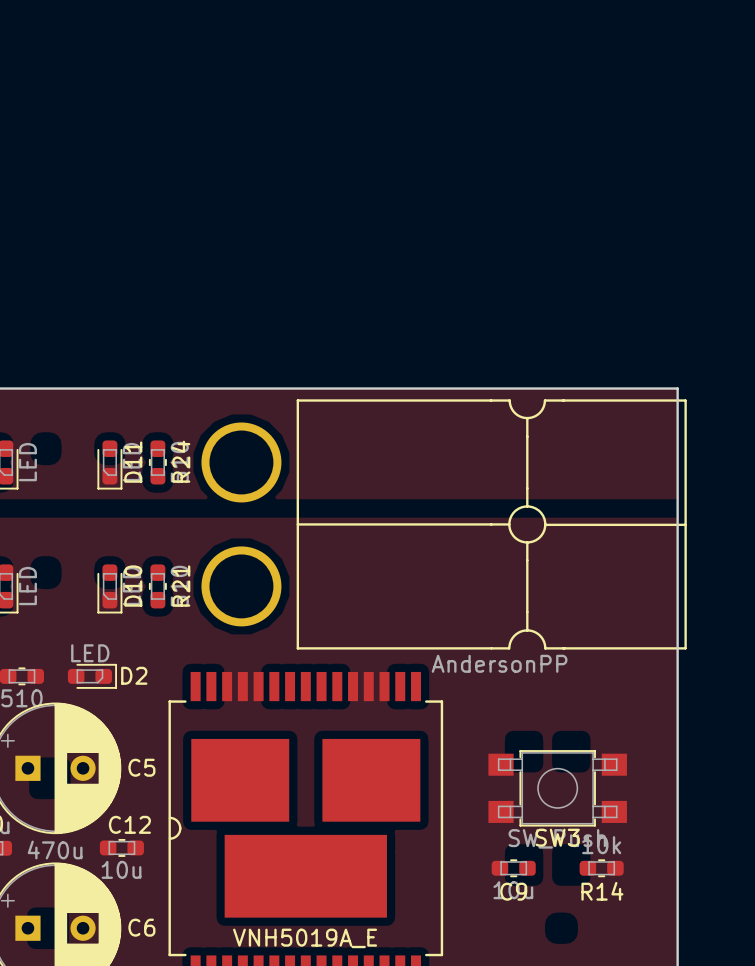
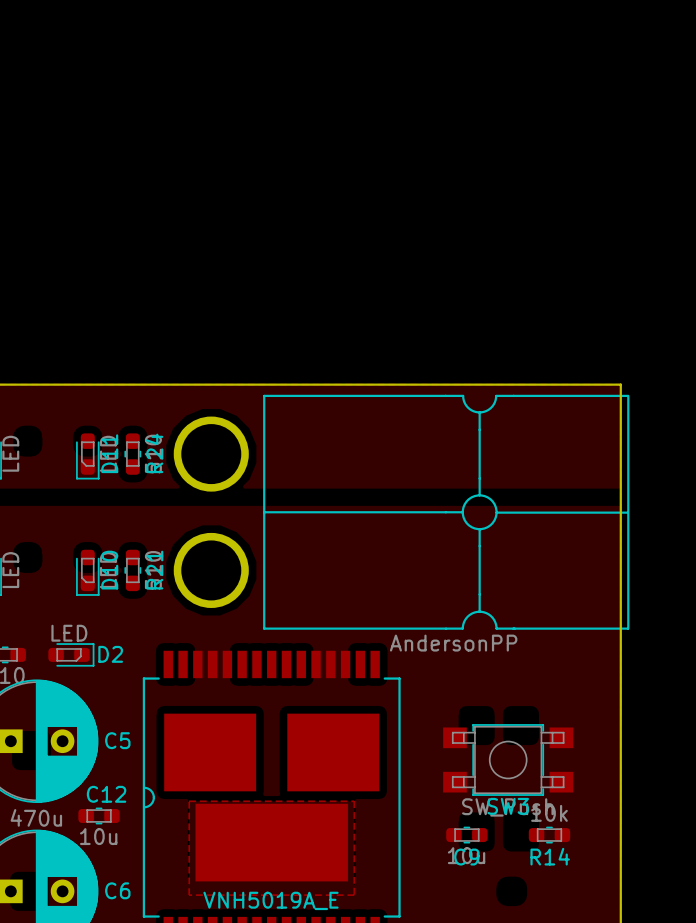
zone outline: none -> (189, 801) (354, 801) (354, 895) (189, 895) (189, 801)

